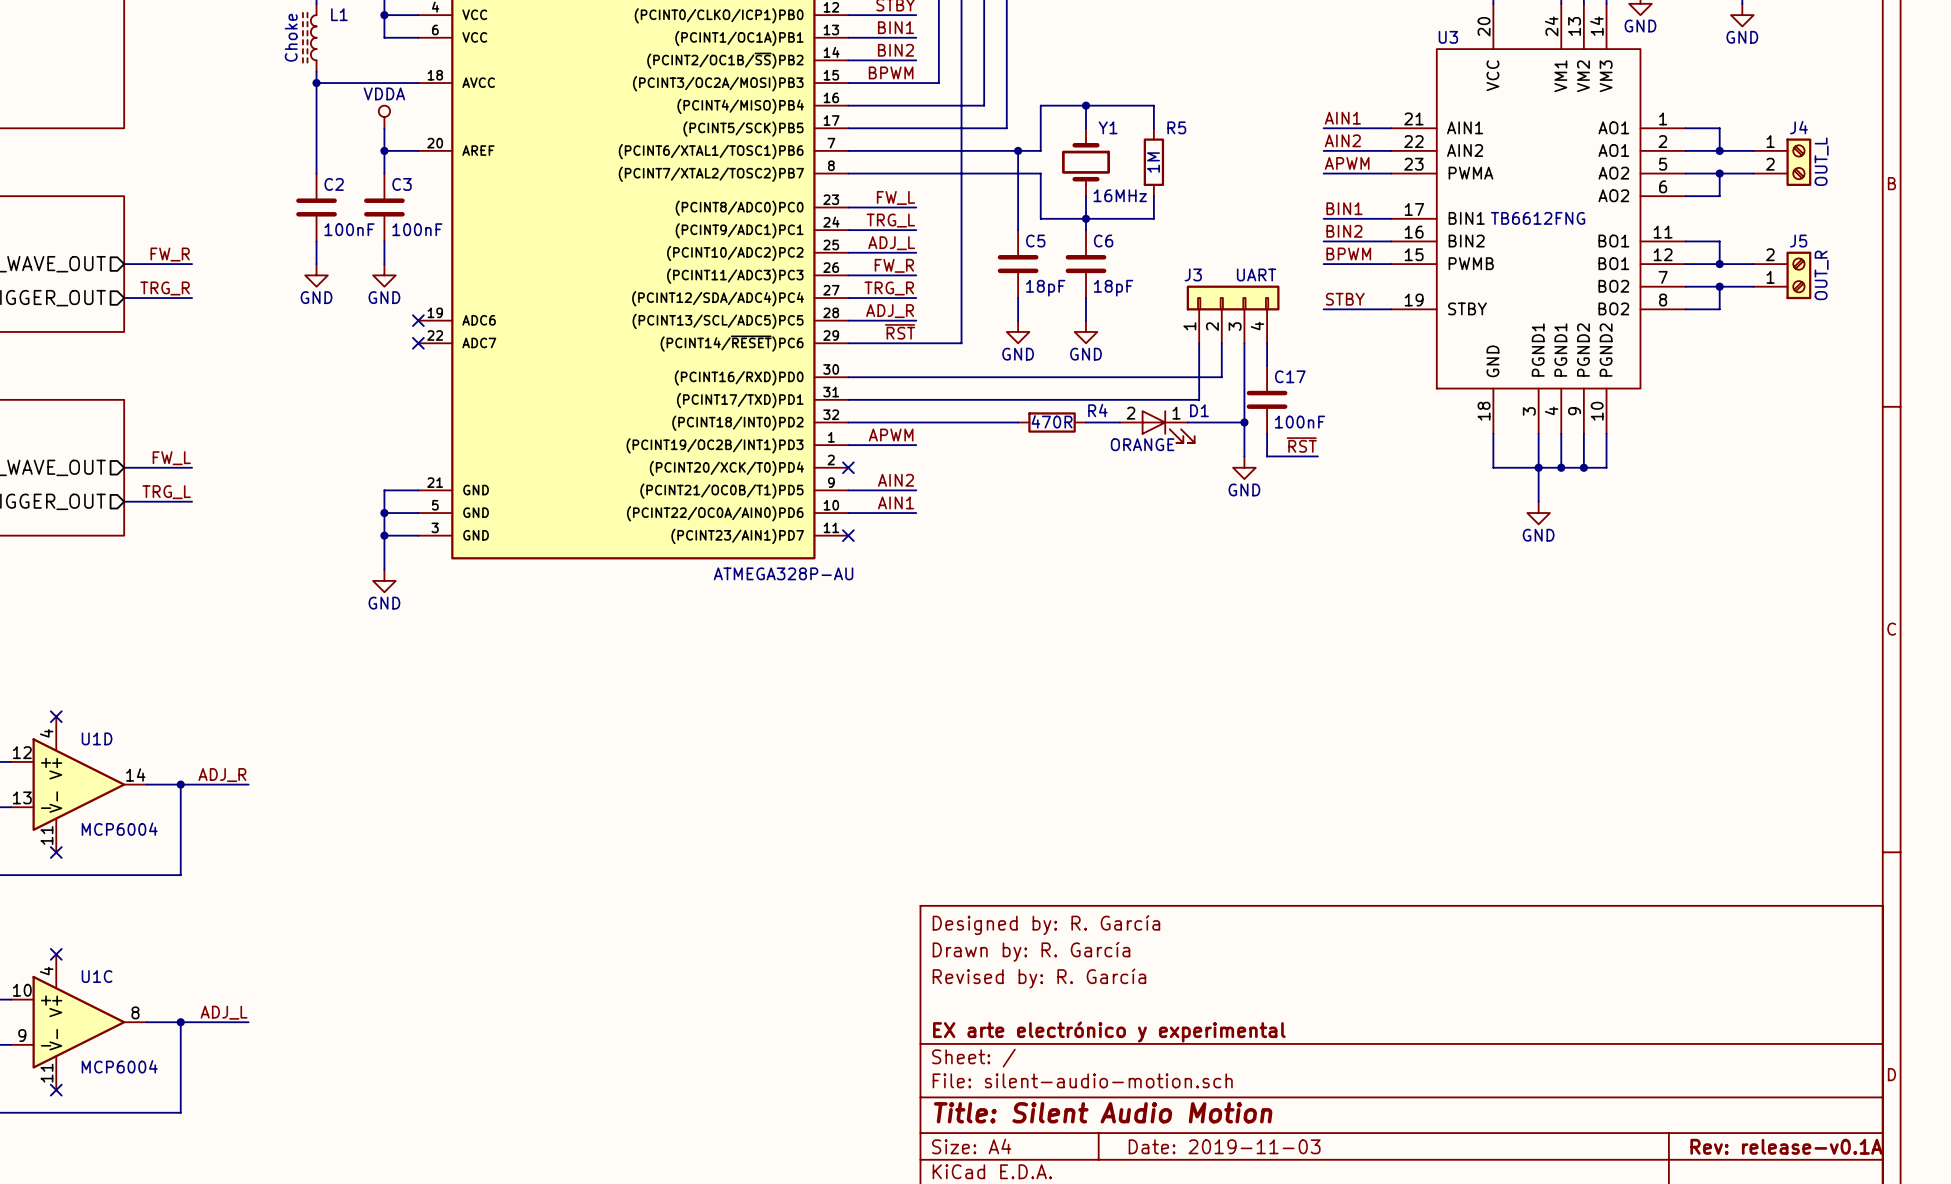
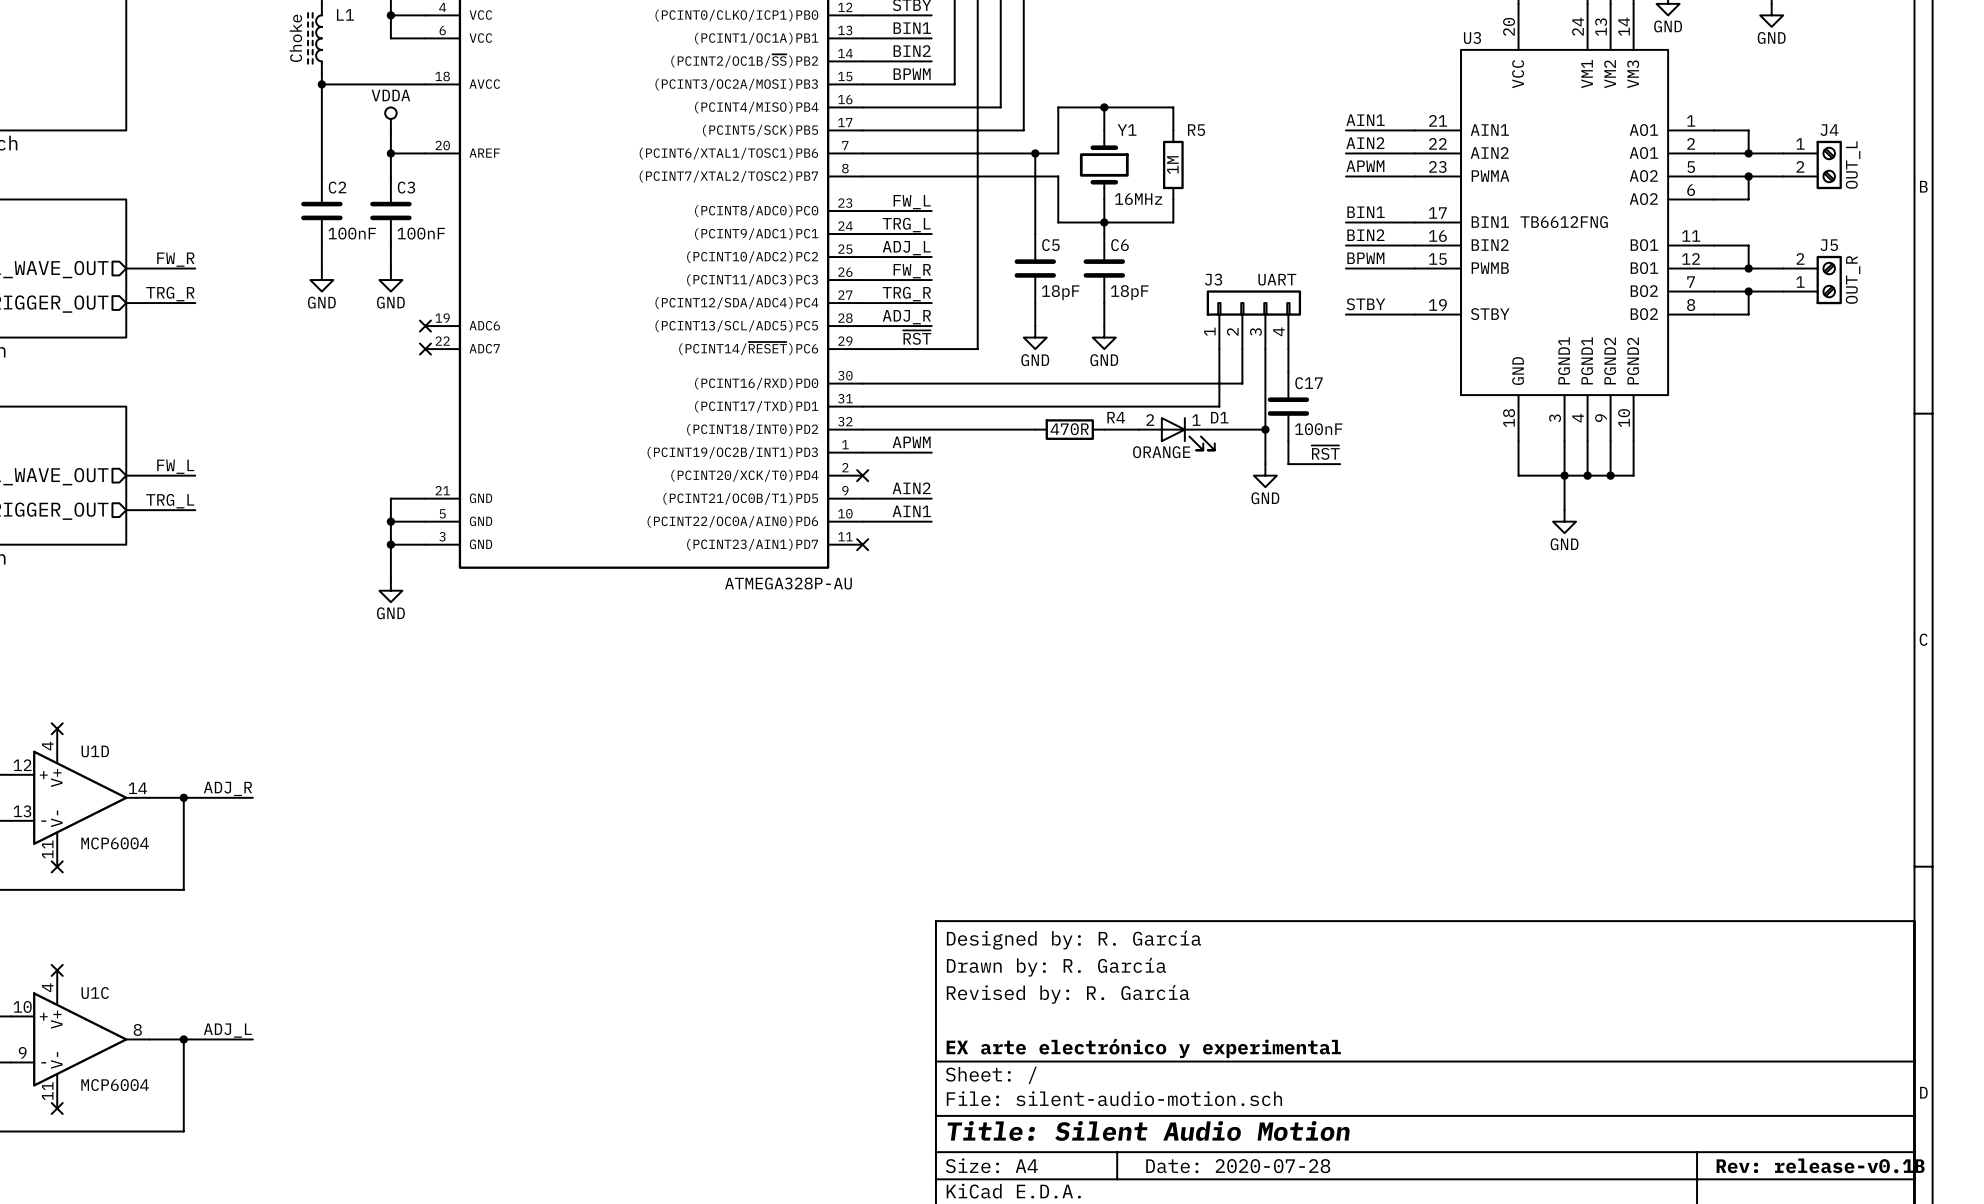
title block: Date: 2019-11-03 (1224, 1146) -> Date: 2020-07-28 (1238, 1166)
title block: Rev: release-v0.1A (1786, 1146) -> Rev: release-v0.1B (1820, 1165)

